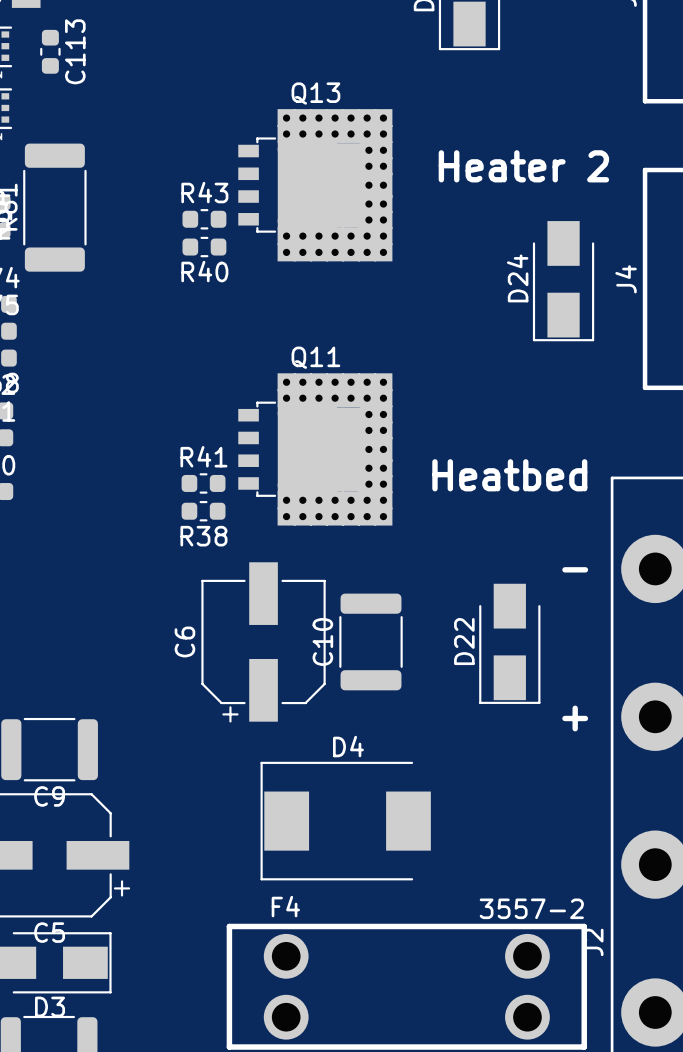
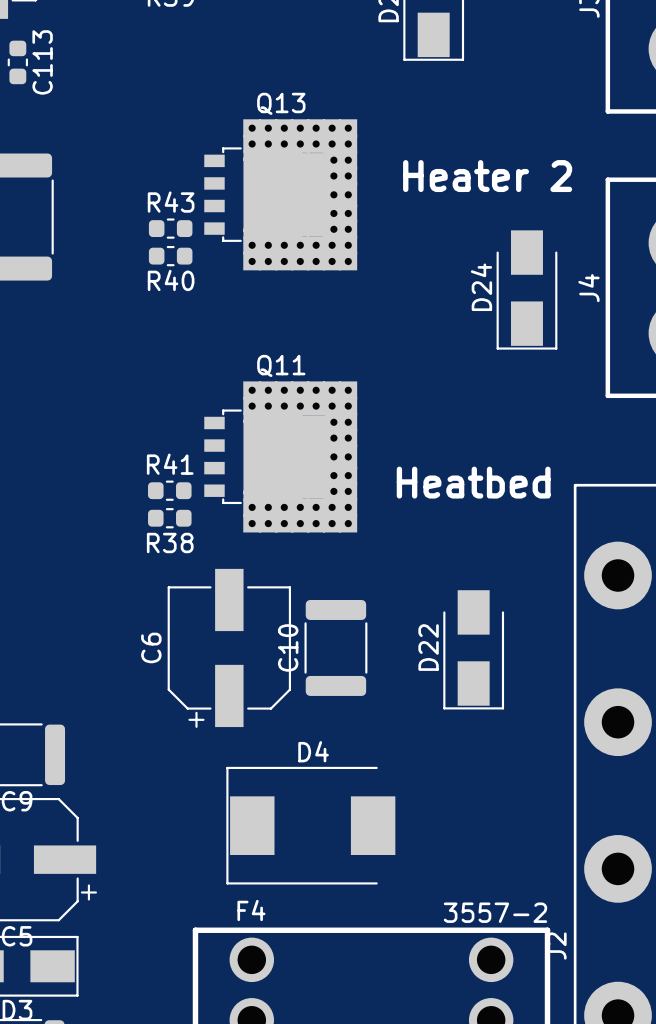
text: - (575, 569) -> none
text: + (575, 718) -> none

